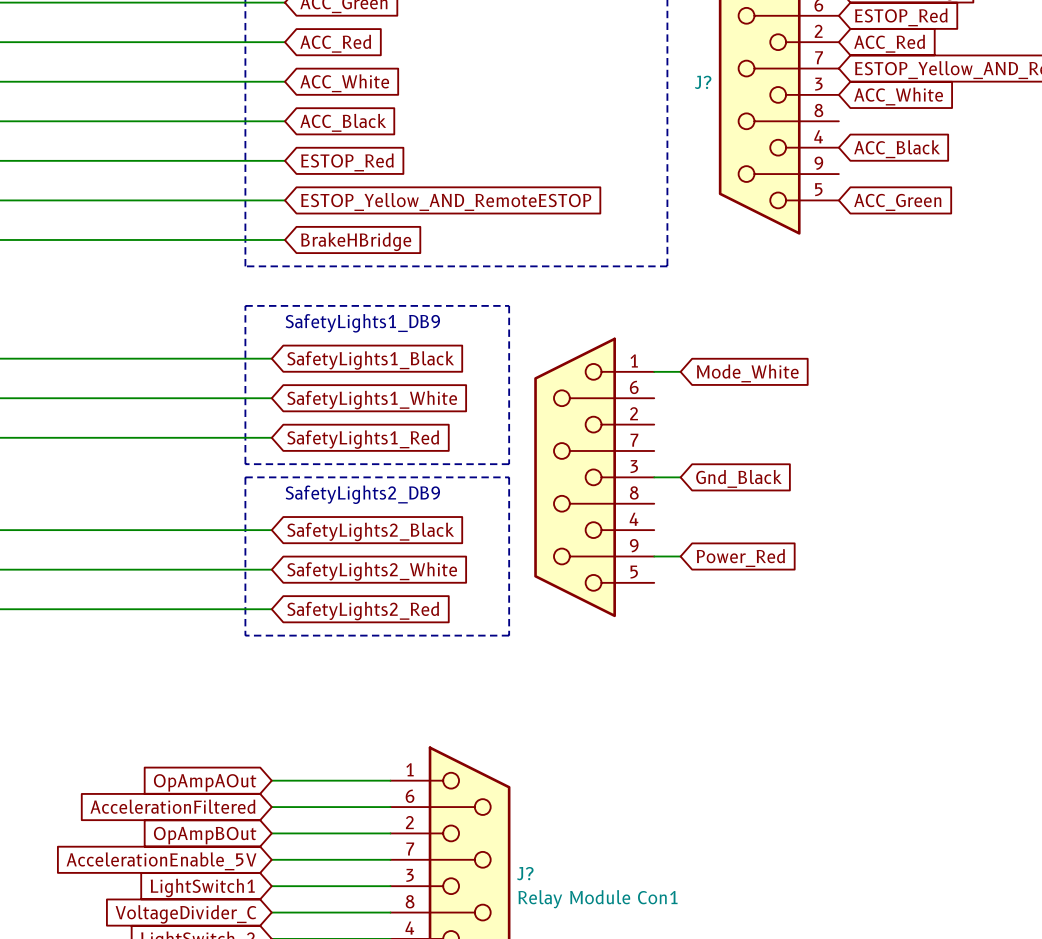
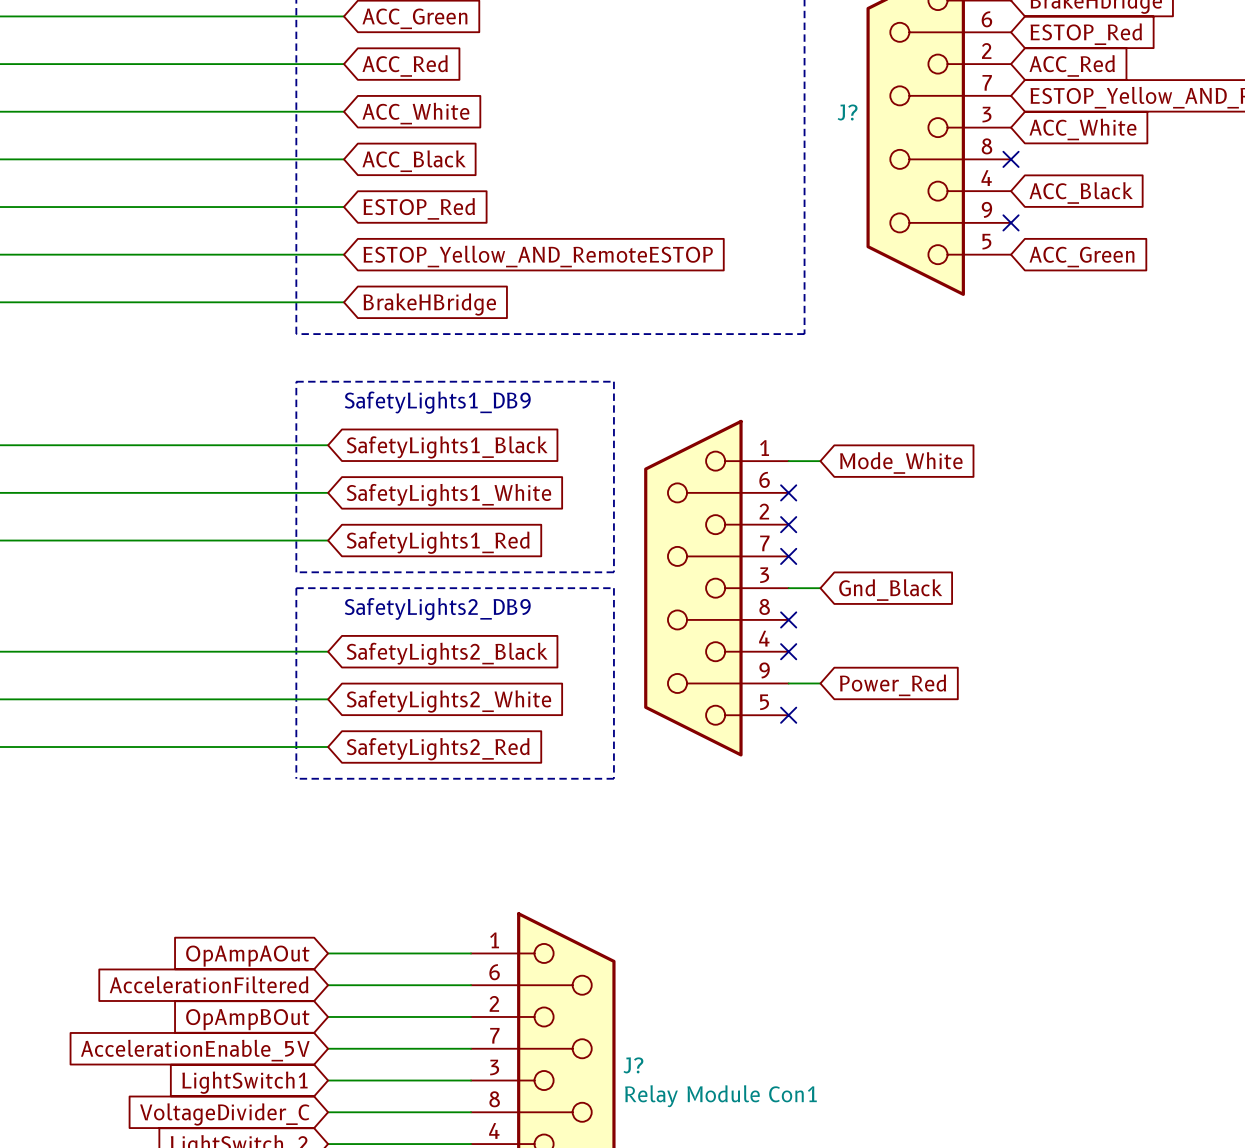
no-connect mark: none -> (1011, 159)
no-connect mark: none -> (1011, 222)
no-connect mark: none -> (788, 492)
no-connect mark: none -> (788, 524)
no-connect mark: none -> (788, 556)
no-connect mark: none -> (788, 619)
no-connect mark: none -> (788, 651)
no-connect mark: none -> (788, 715)

